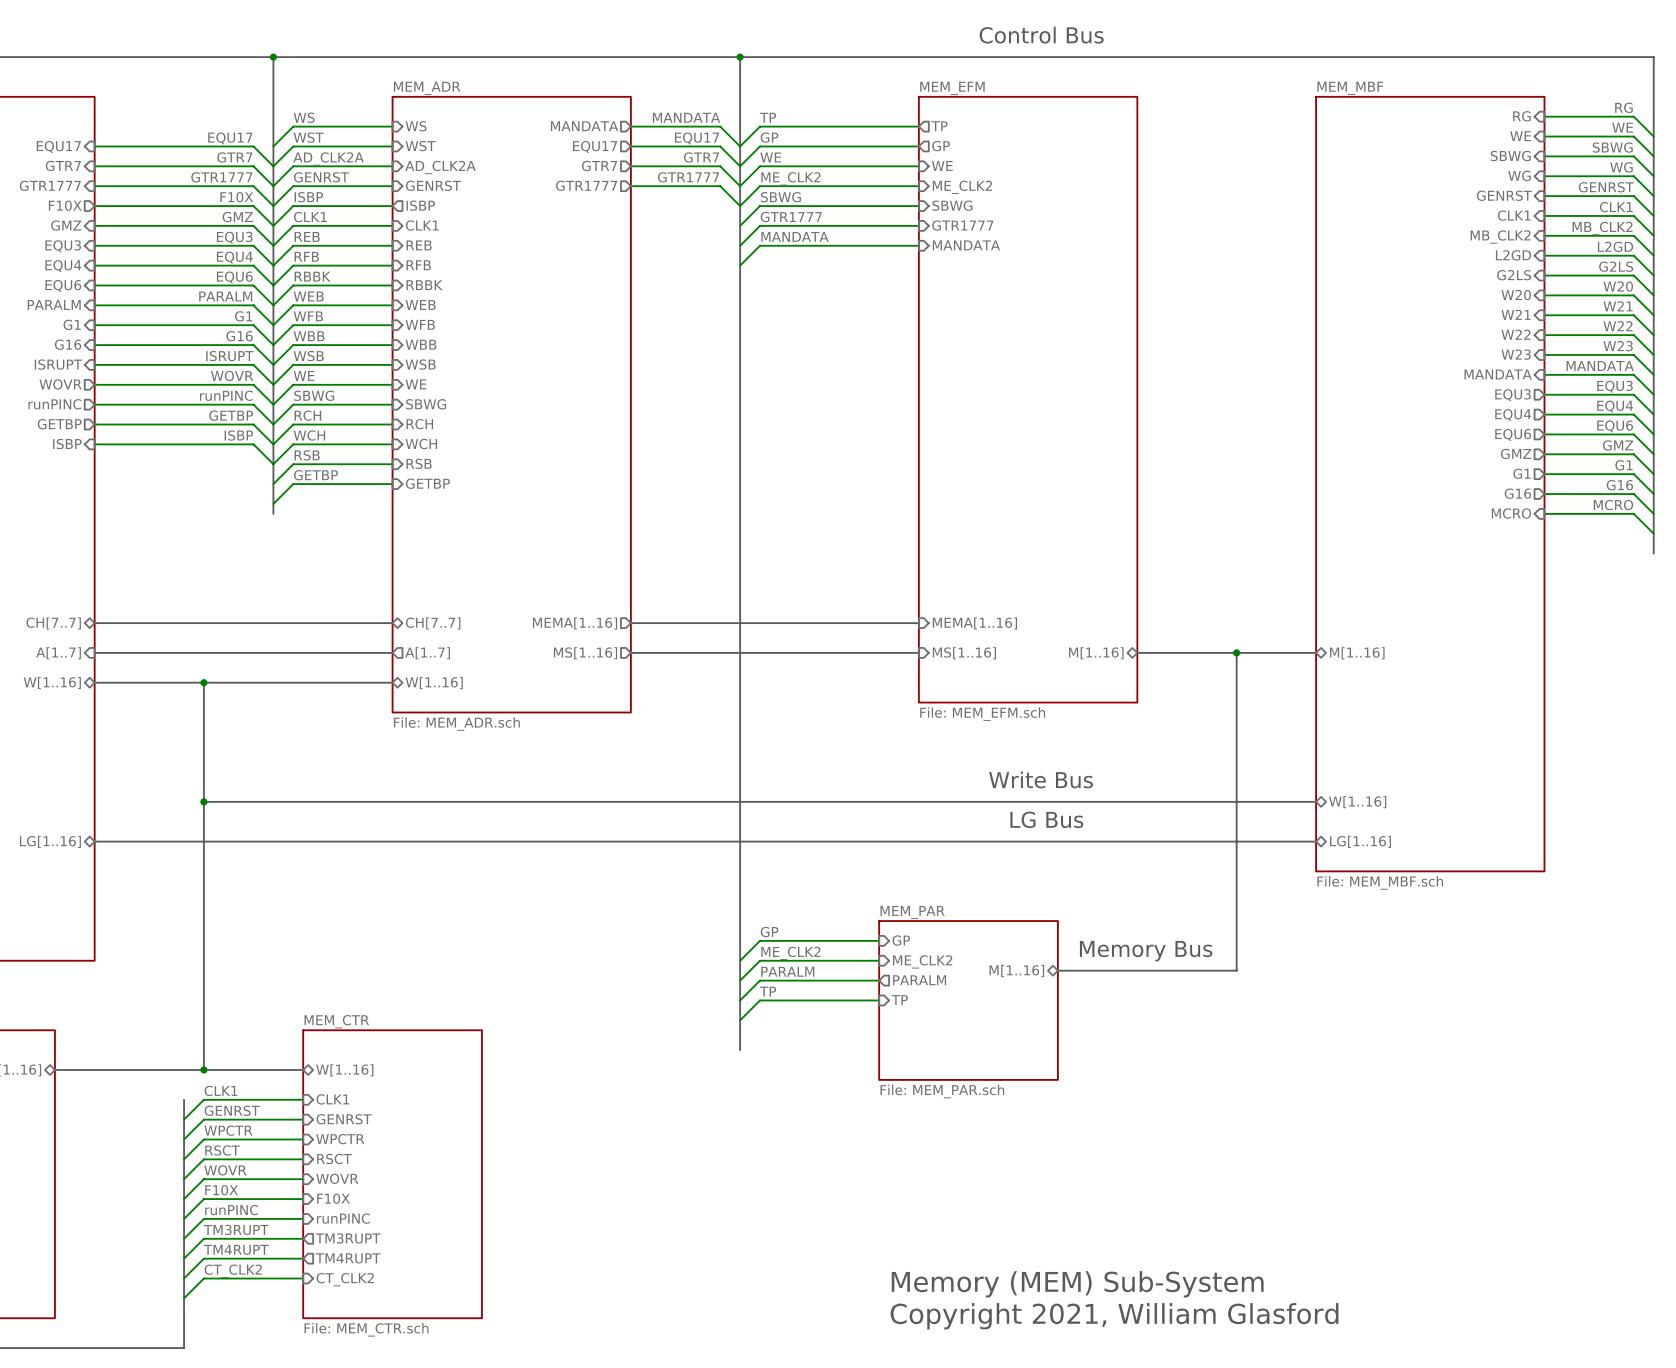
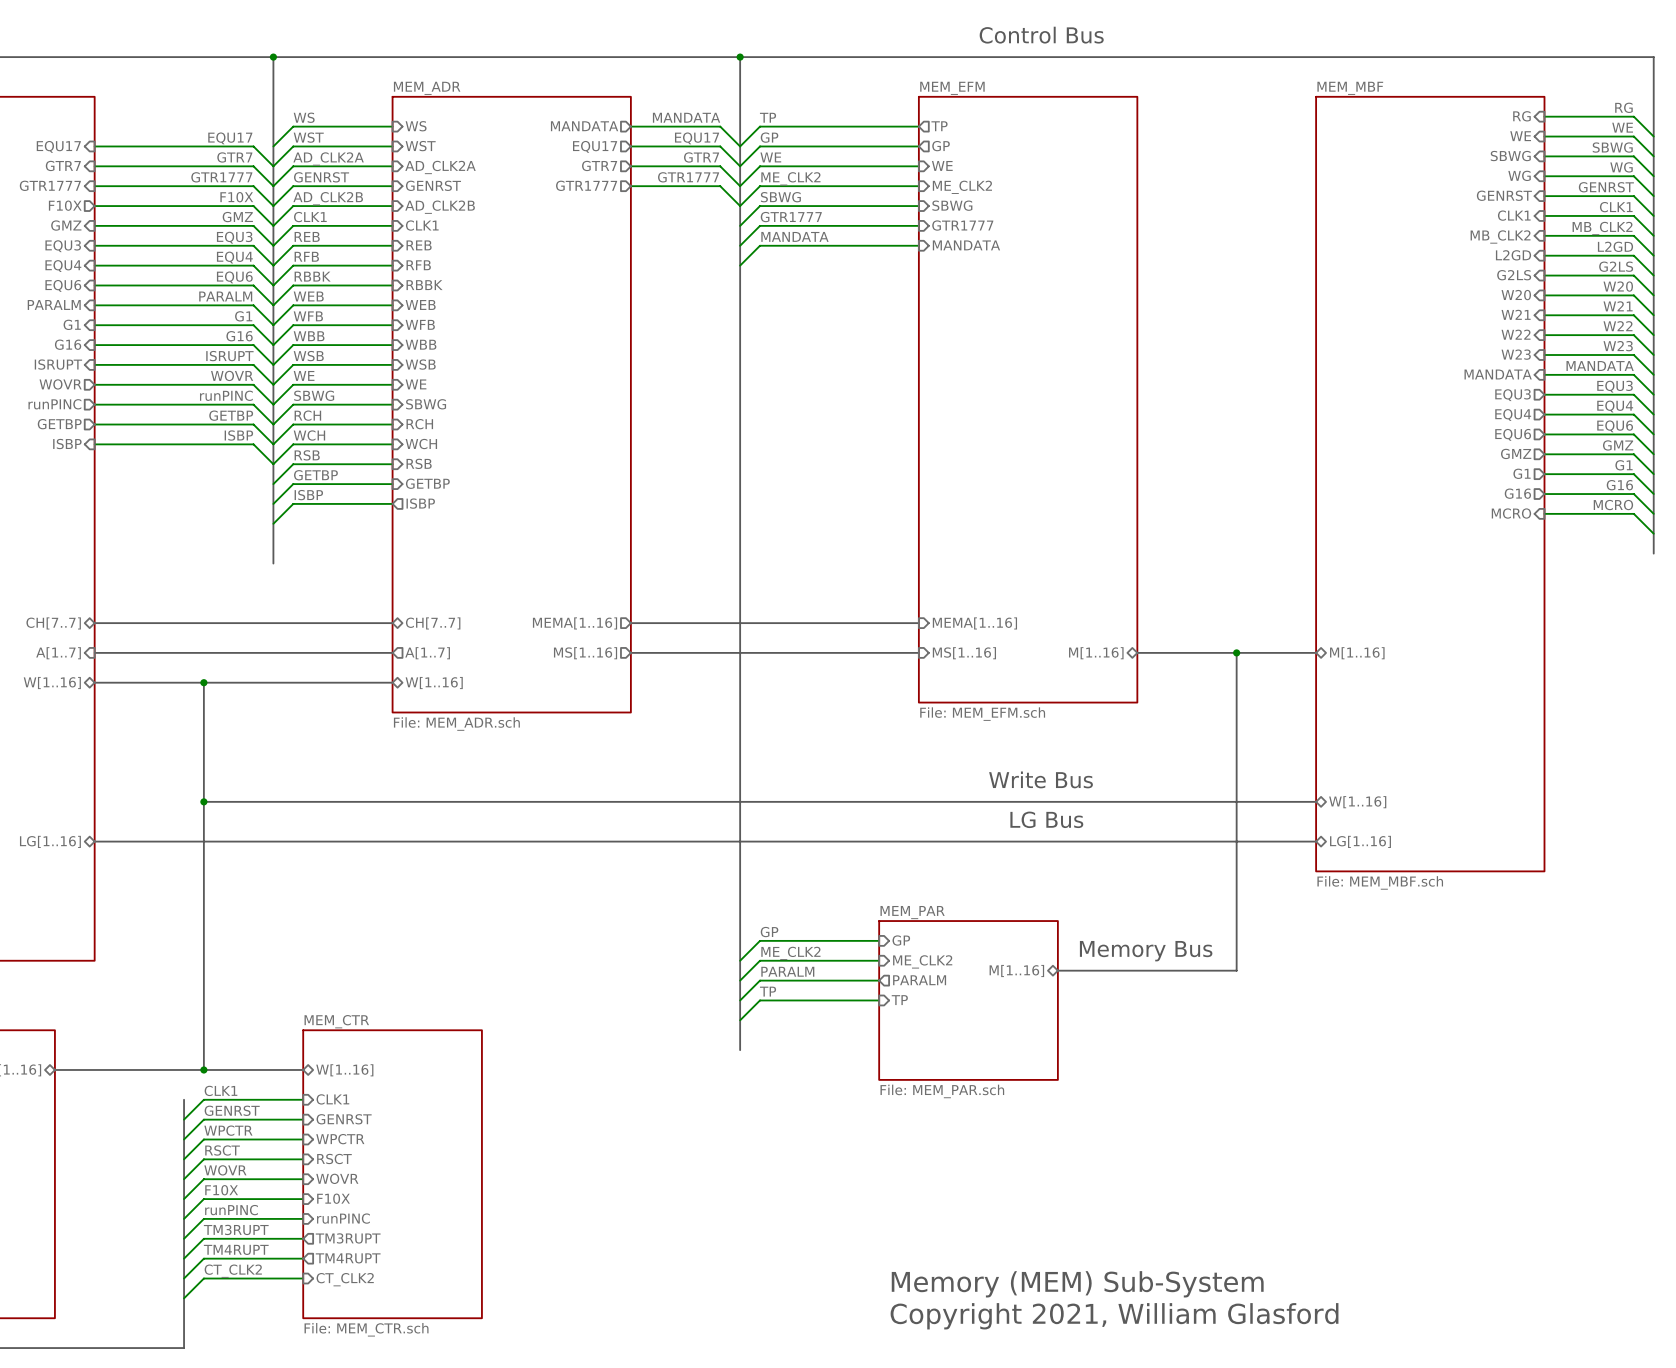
label: ISBP (308, 197) -> AD_CLK2B (328, 198)
sheet pin shape: output (420, 205) -> input (440, 207)
sheet pin: ISBP (420, 205) -> AD_CLK2B (440, 207)
label: none -> ISBP (308, 495)
wire: none -> (392, 503) (293, 503) (273, 523)
sheet pin: none -> ISBP (420, 503)
bus: none -> (273, 513) (273, 563)

